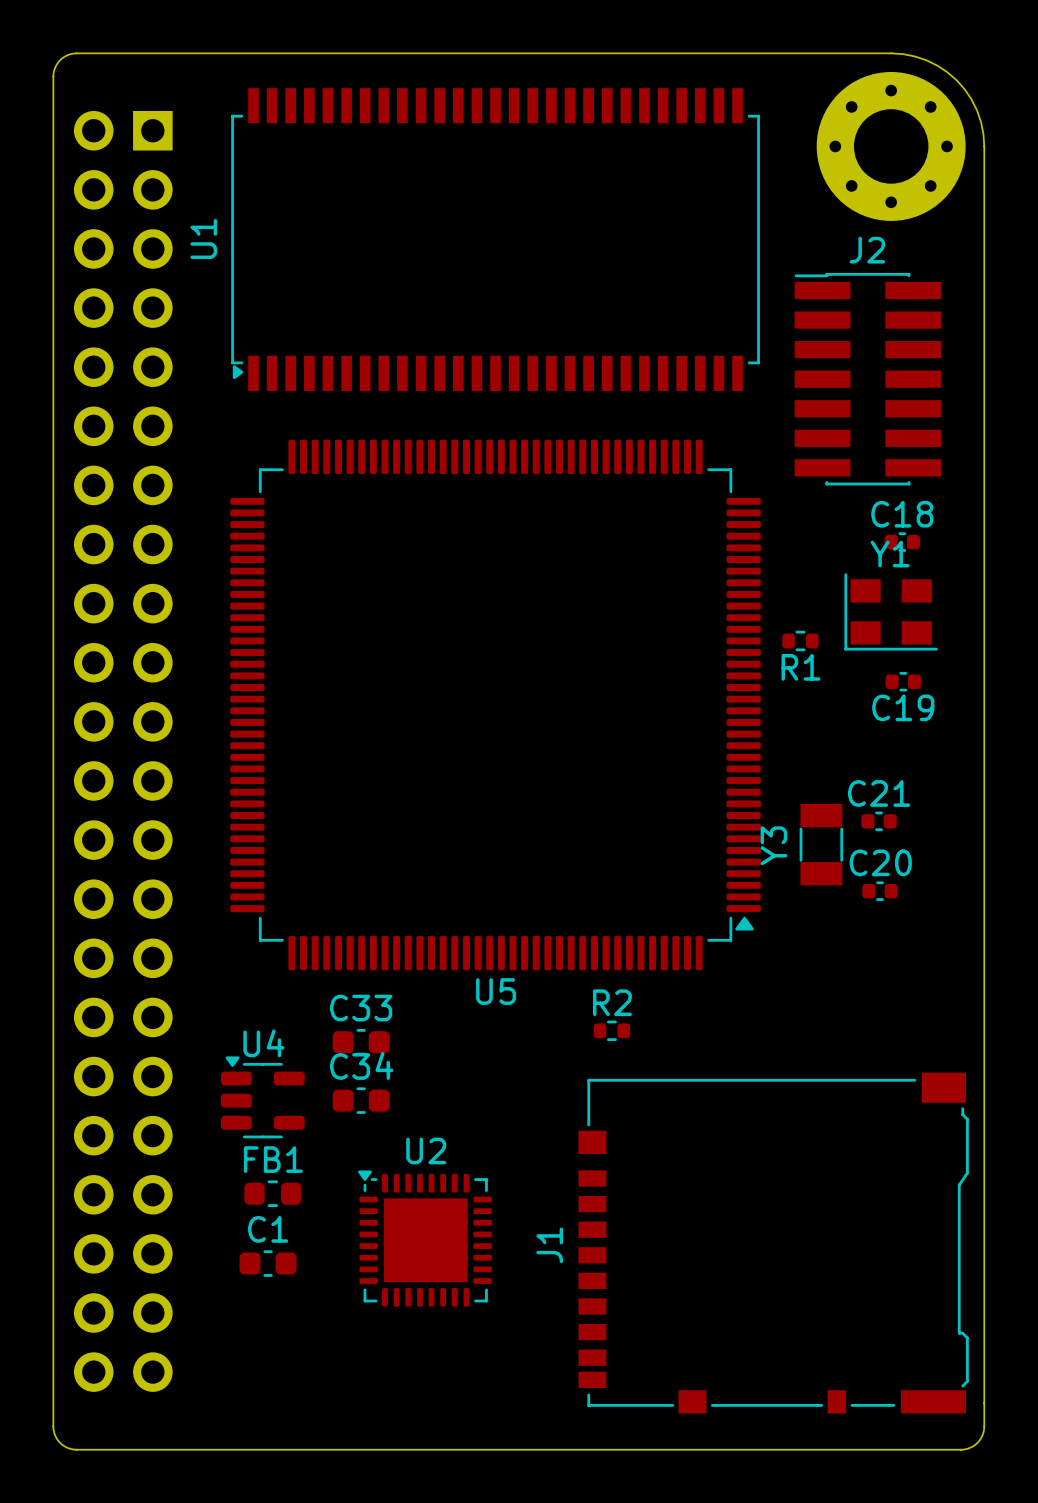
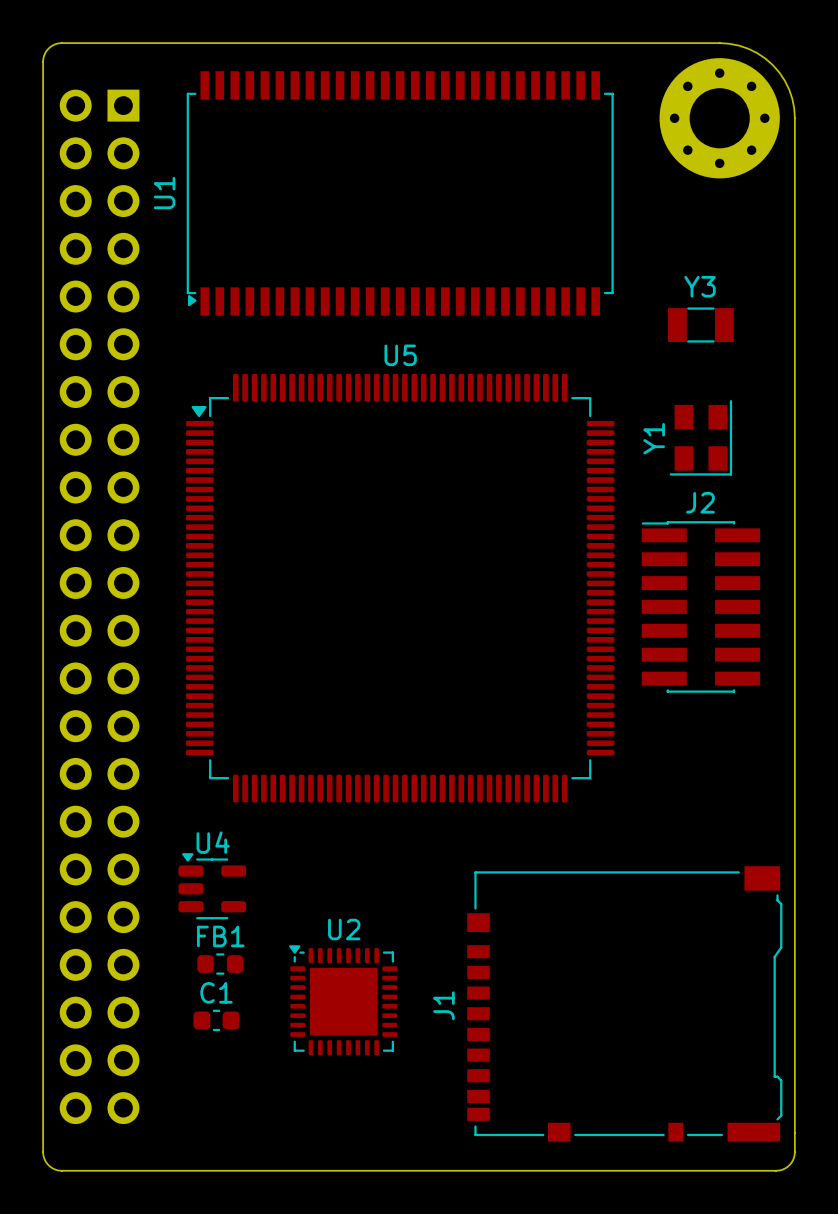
J2 position: (867, 379) -> (700, 606)
C18: (902, 542) -> none
Y1 rotation: 0° (891, 611) -> 90° counterclockwise (700, 437)
Y1 position: (891, 611) -> (700, 437)
R1: (800, 641) -> none
C19: (903, 681) -> none
U5 rotation: 0° (495, 705) -> 180° (400, 588)
C21: (879, 821) -> none
Y3 rotation: 0° (821, 844) -> 90° clockwise (700, 325)
Y3 position: (821, 844) -> (700, 325)
C20: (880, 891) -> none
R2: (611, 1030) -> none
C33: (361, 1042) -> none
C34: (361, 1100) -> none

